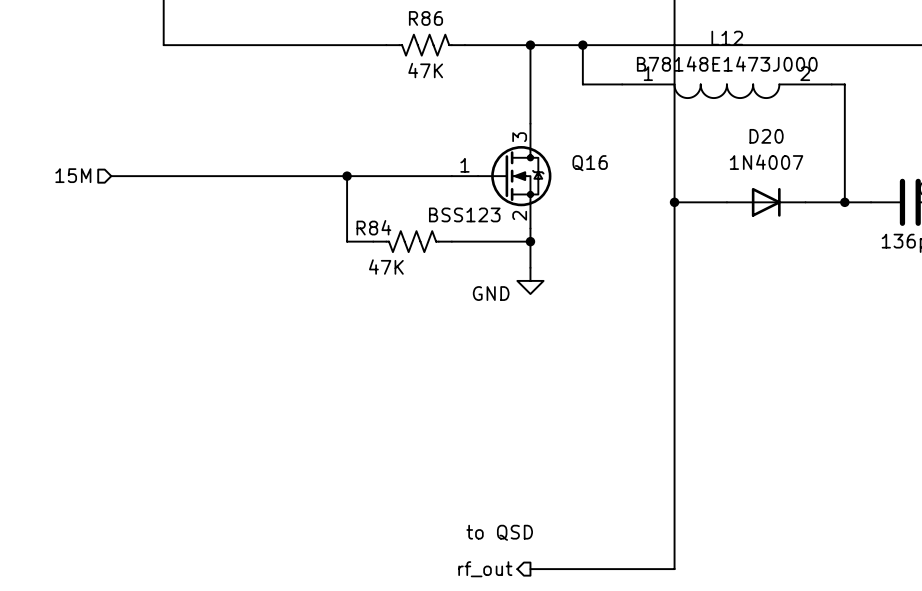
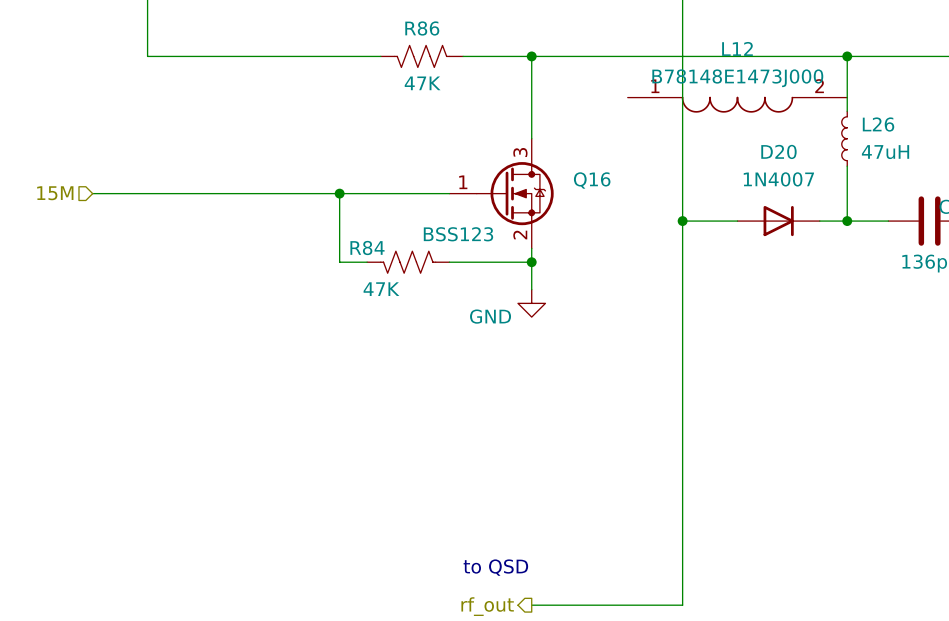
wire: (582, 45) (582, 84) (622, 84) -> none
junction: (582, 45) -> none
wire: none -> (847, 56) (847, 111)
junction: none -> (847, 56)
wire: (831, 84) (844, 84) (844, 202) -> none
L26: none -> 47uH (844, 138)
wire: none -> (847, 166) (847, 221)
junction position: (844, 202) -> (847, 221)

